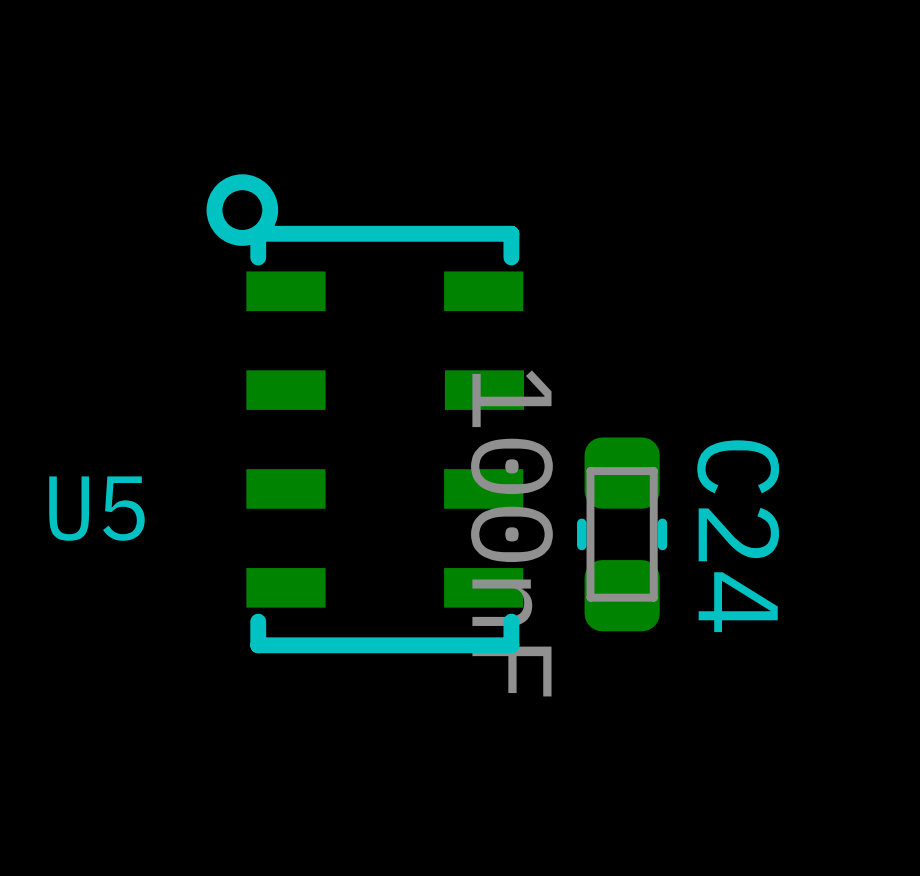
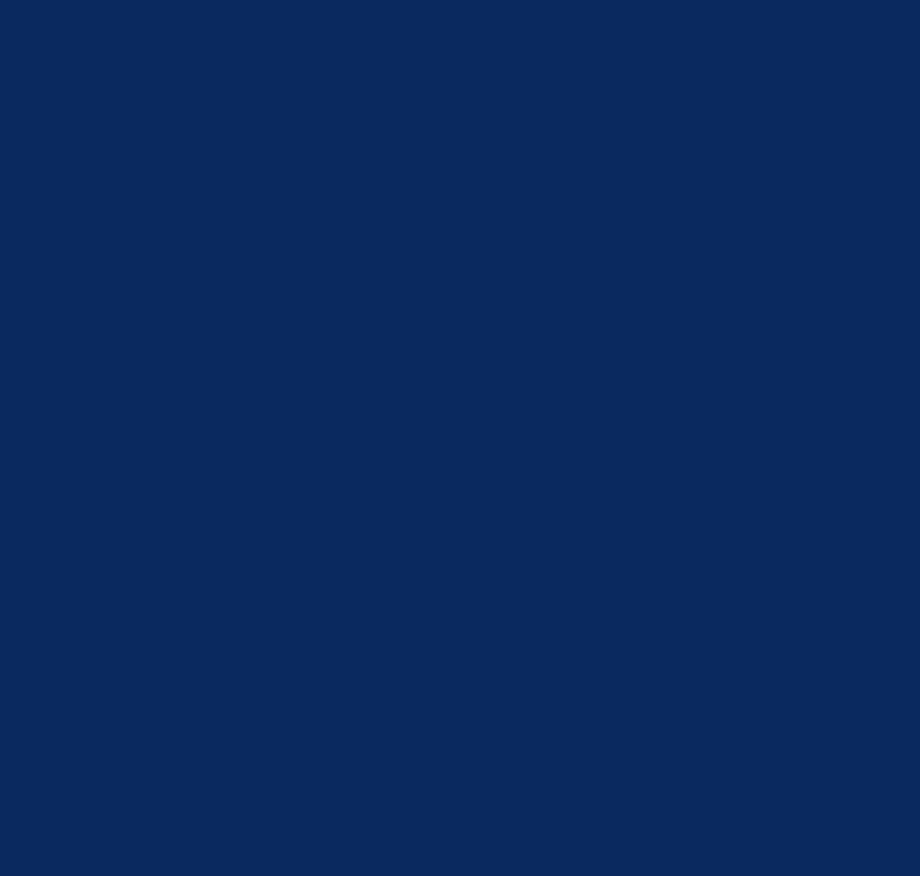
U5: (365, 413) -> none
C24: 100nF (622, 534) -> none

